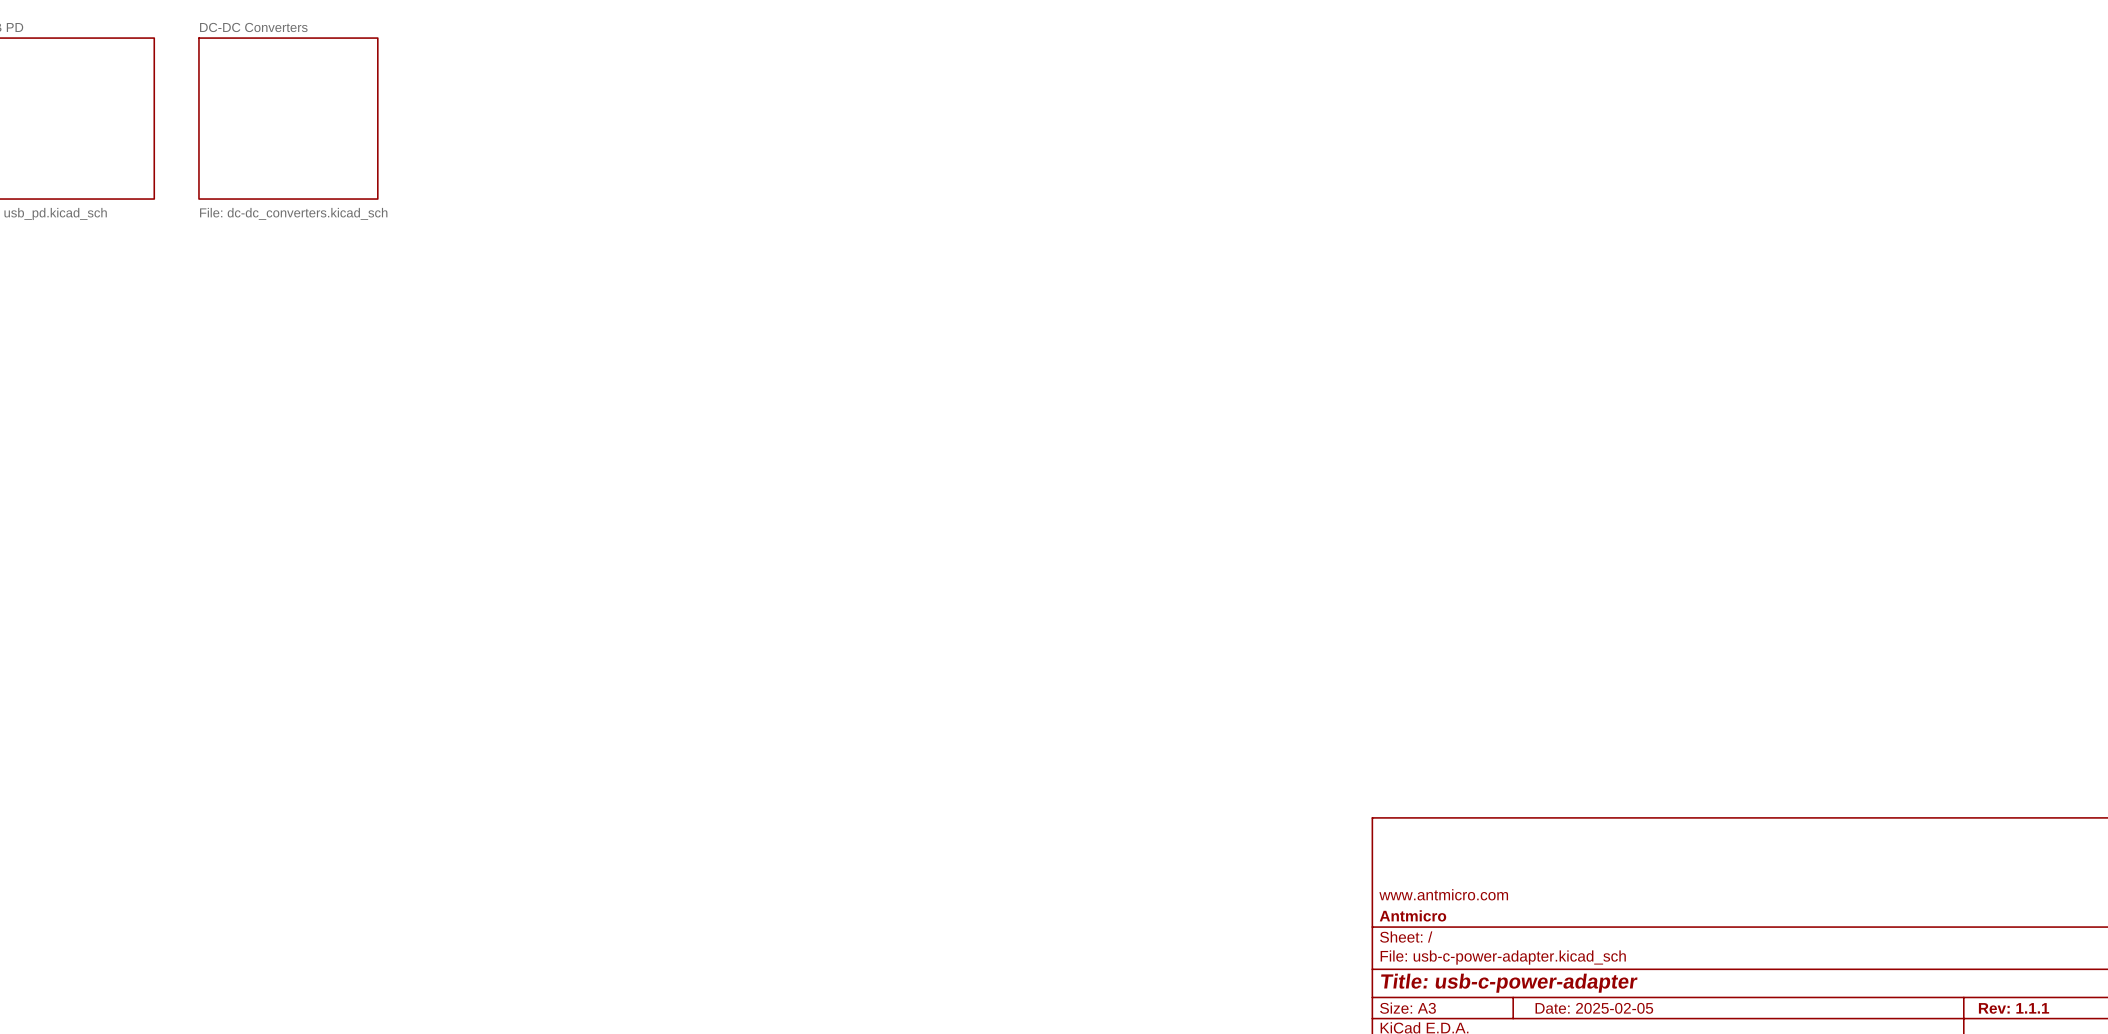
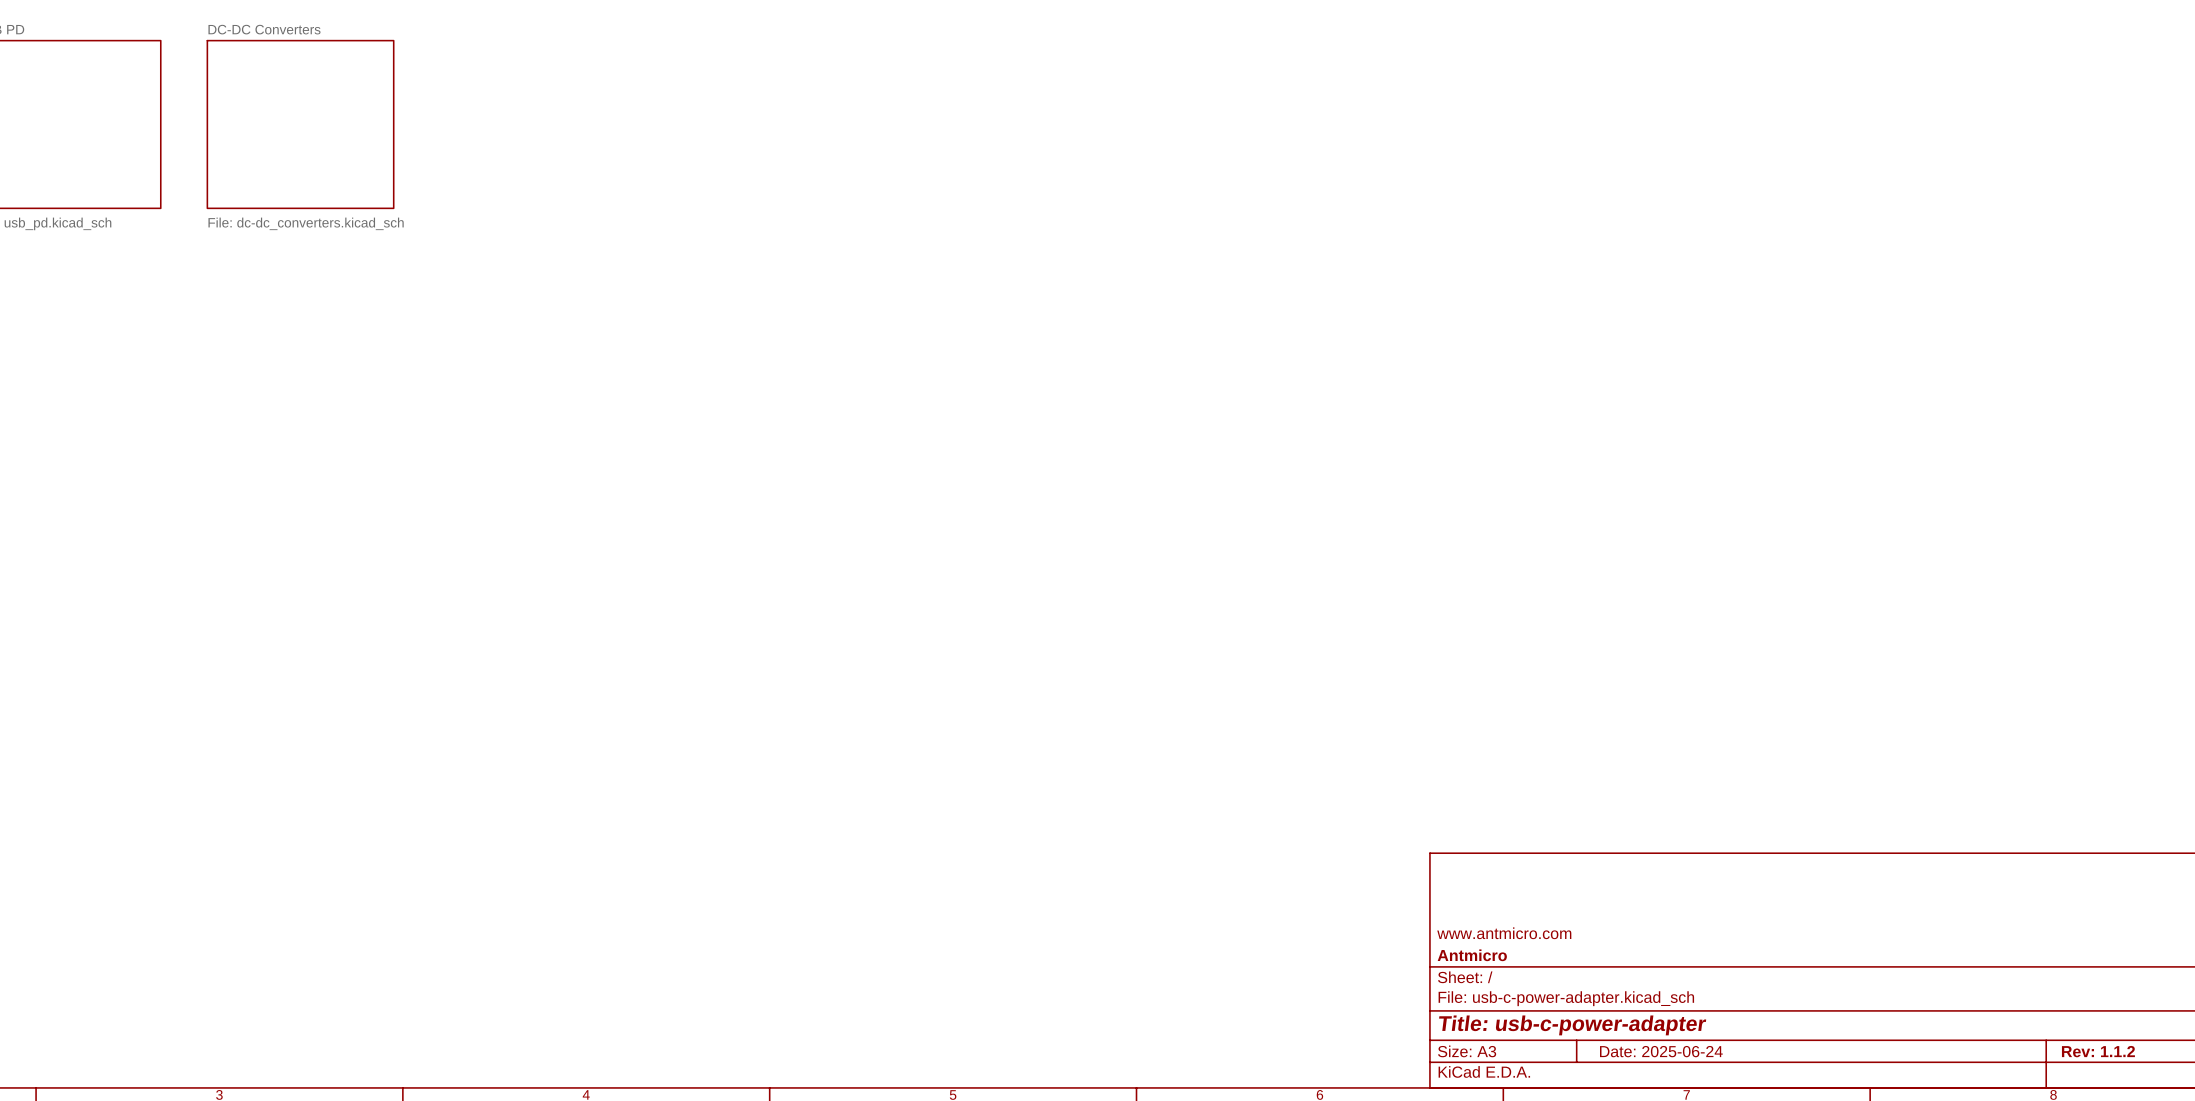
title block: Date: 2025-02-05 (1594, 1008) -> Date: 2025-06-24 (1661, 1051)
title block: Rev: 1.1.1 (2014, 1008) -> Rev: 1.1.2 (2098, 1051)

